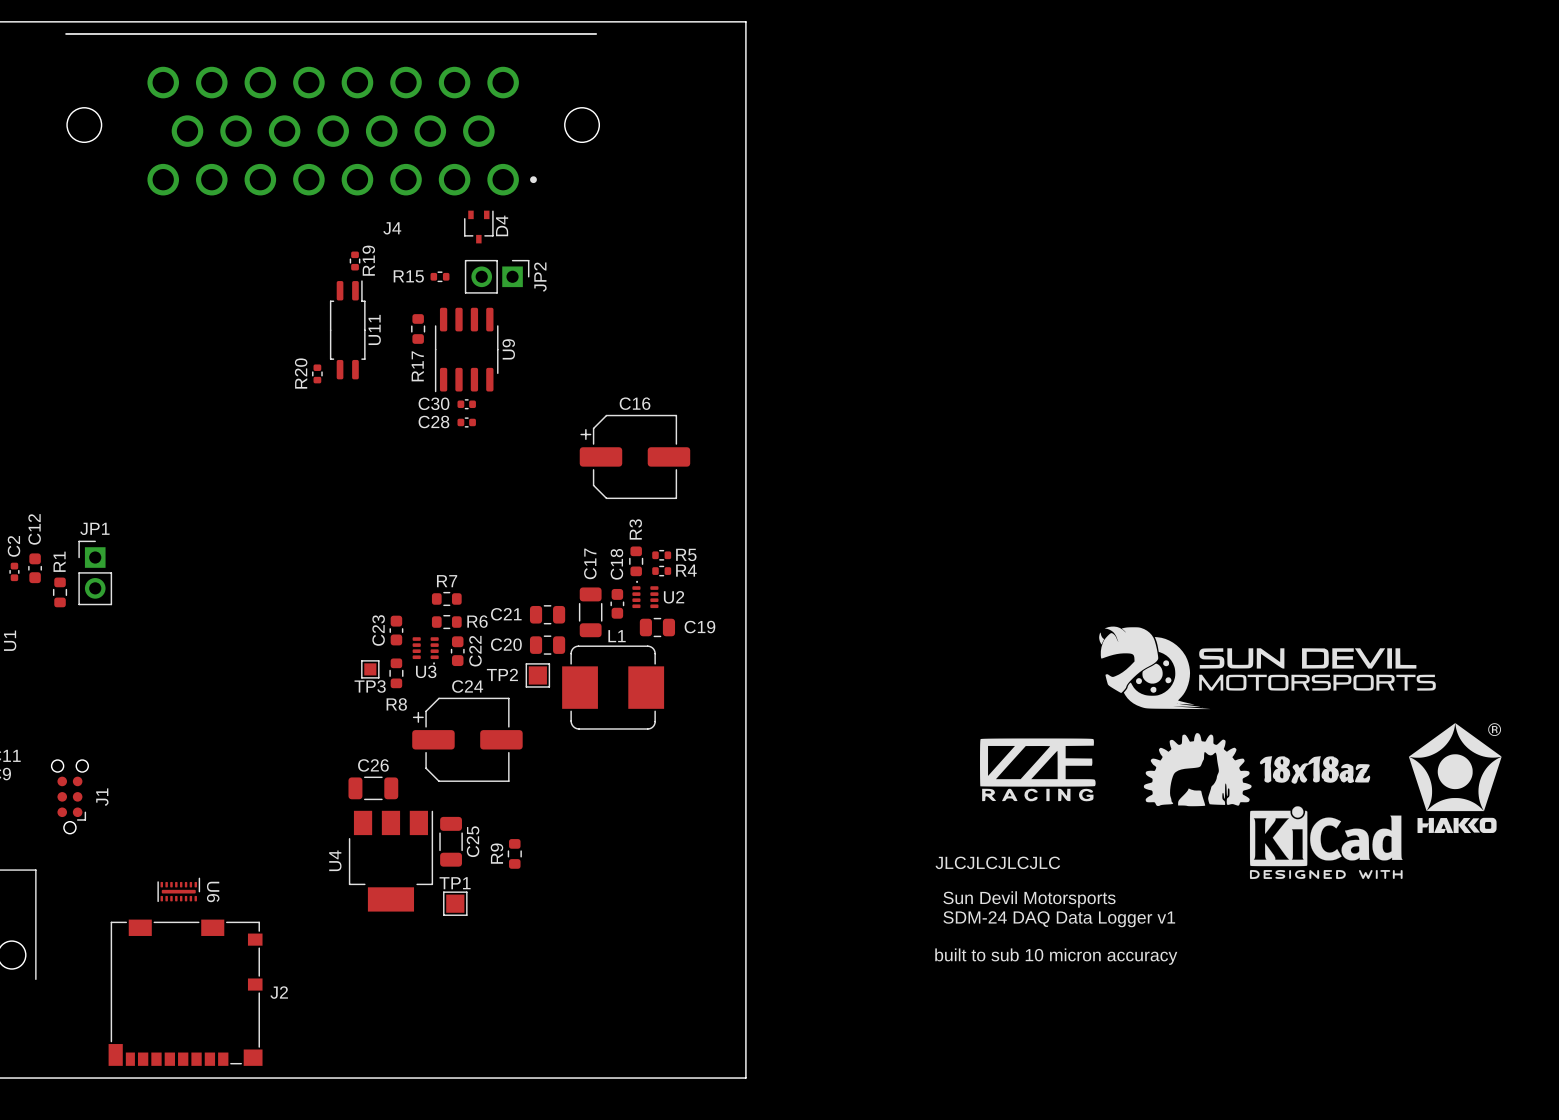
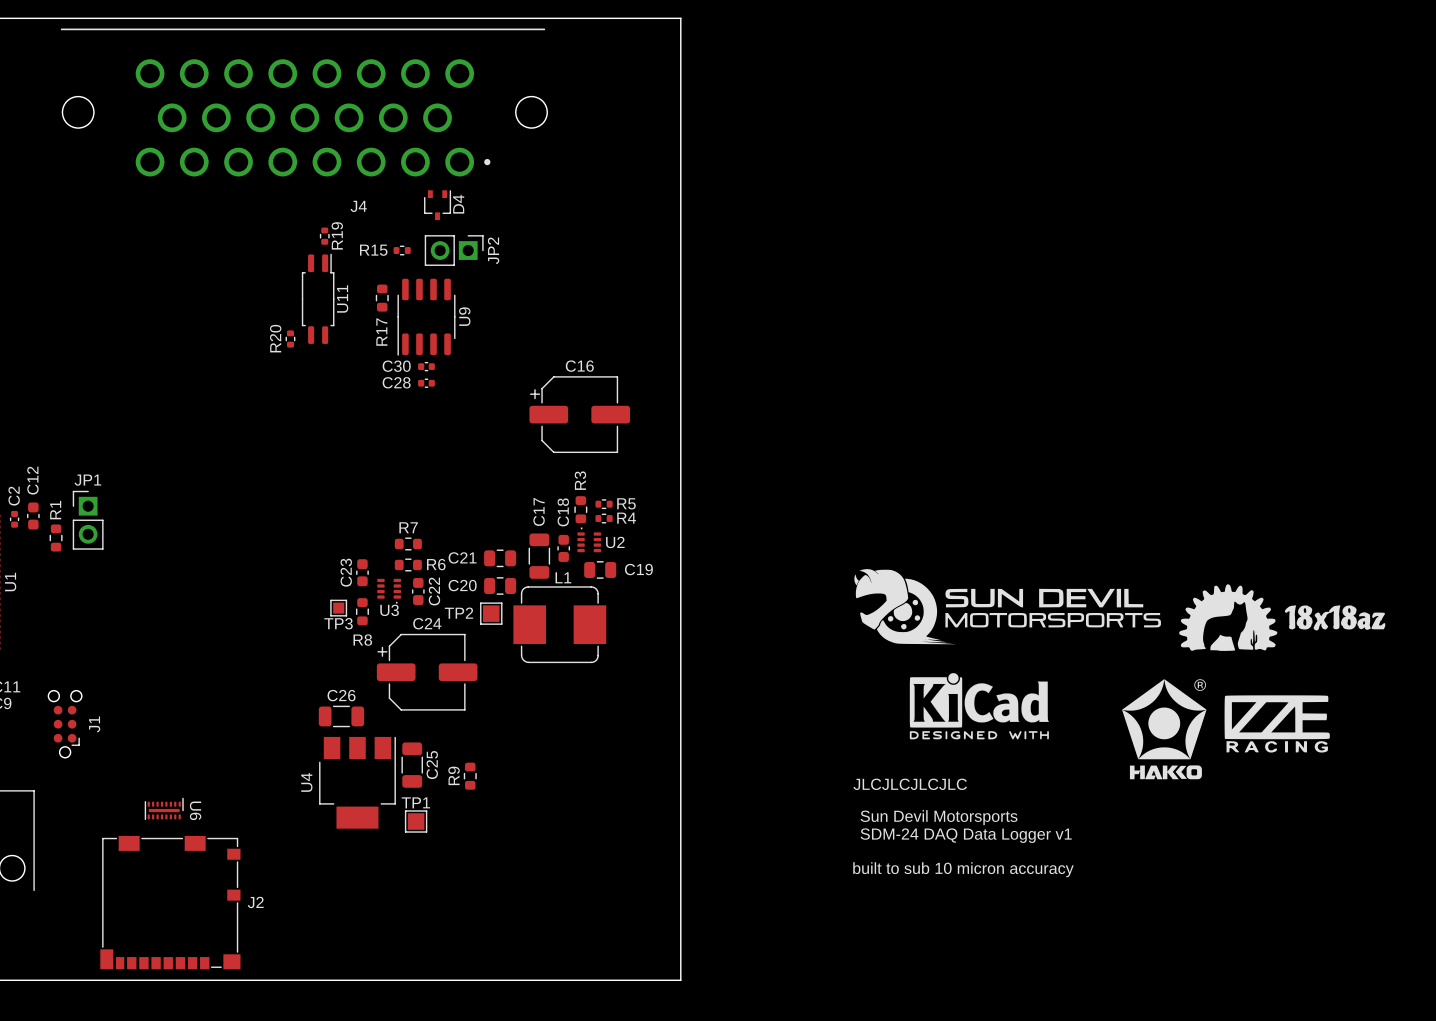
drawing position: (1267, 667) -> (1007, 606)
drawing: [980, 738, 1096, 802] -> none
drawing: none -> [1224, 695, 1330, 753]
drawing position: (1257, 769) -> (1282, 617)
drawing position: (1455, 778) -> (1164, 729)
drawing position: (1326, 842) -> (979, 706)

